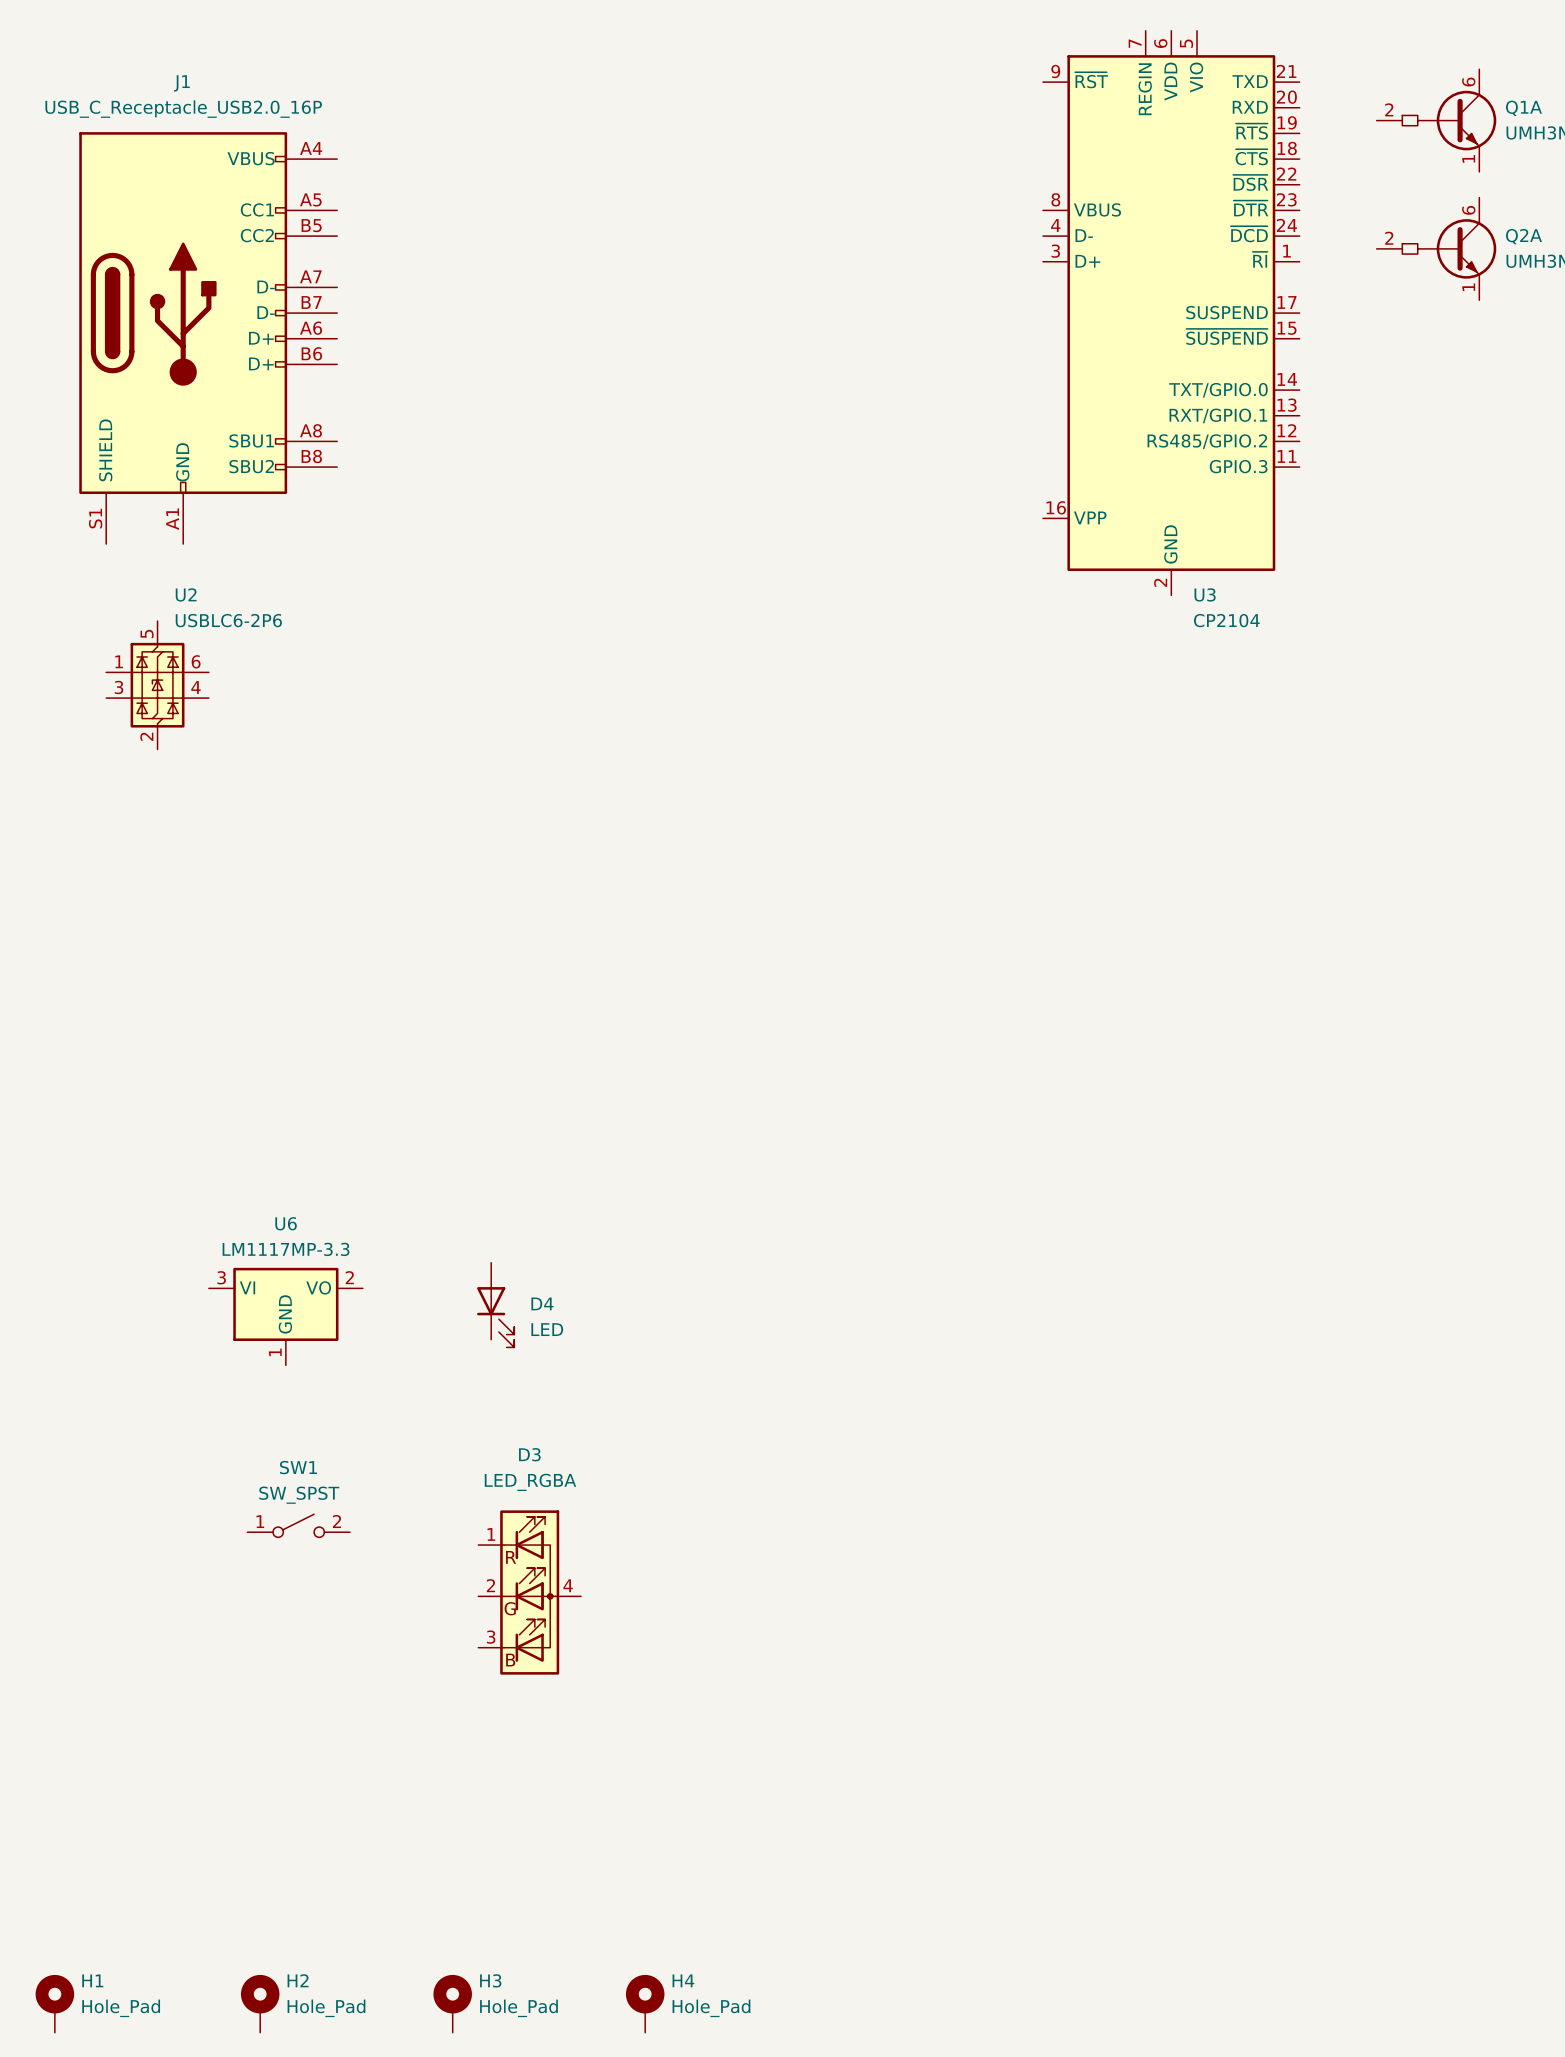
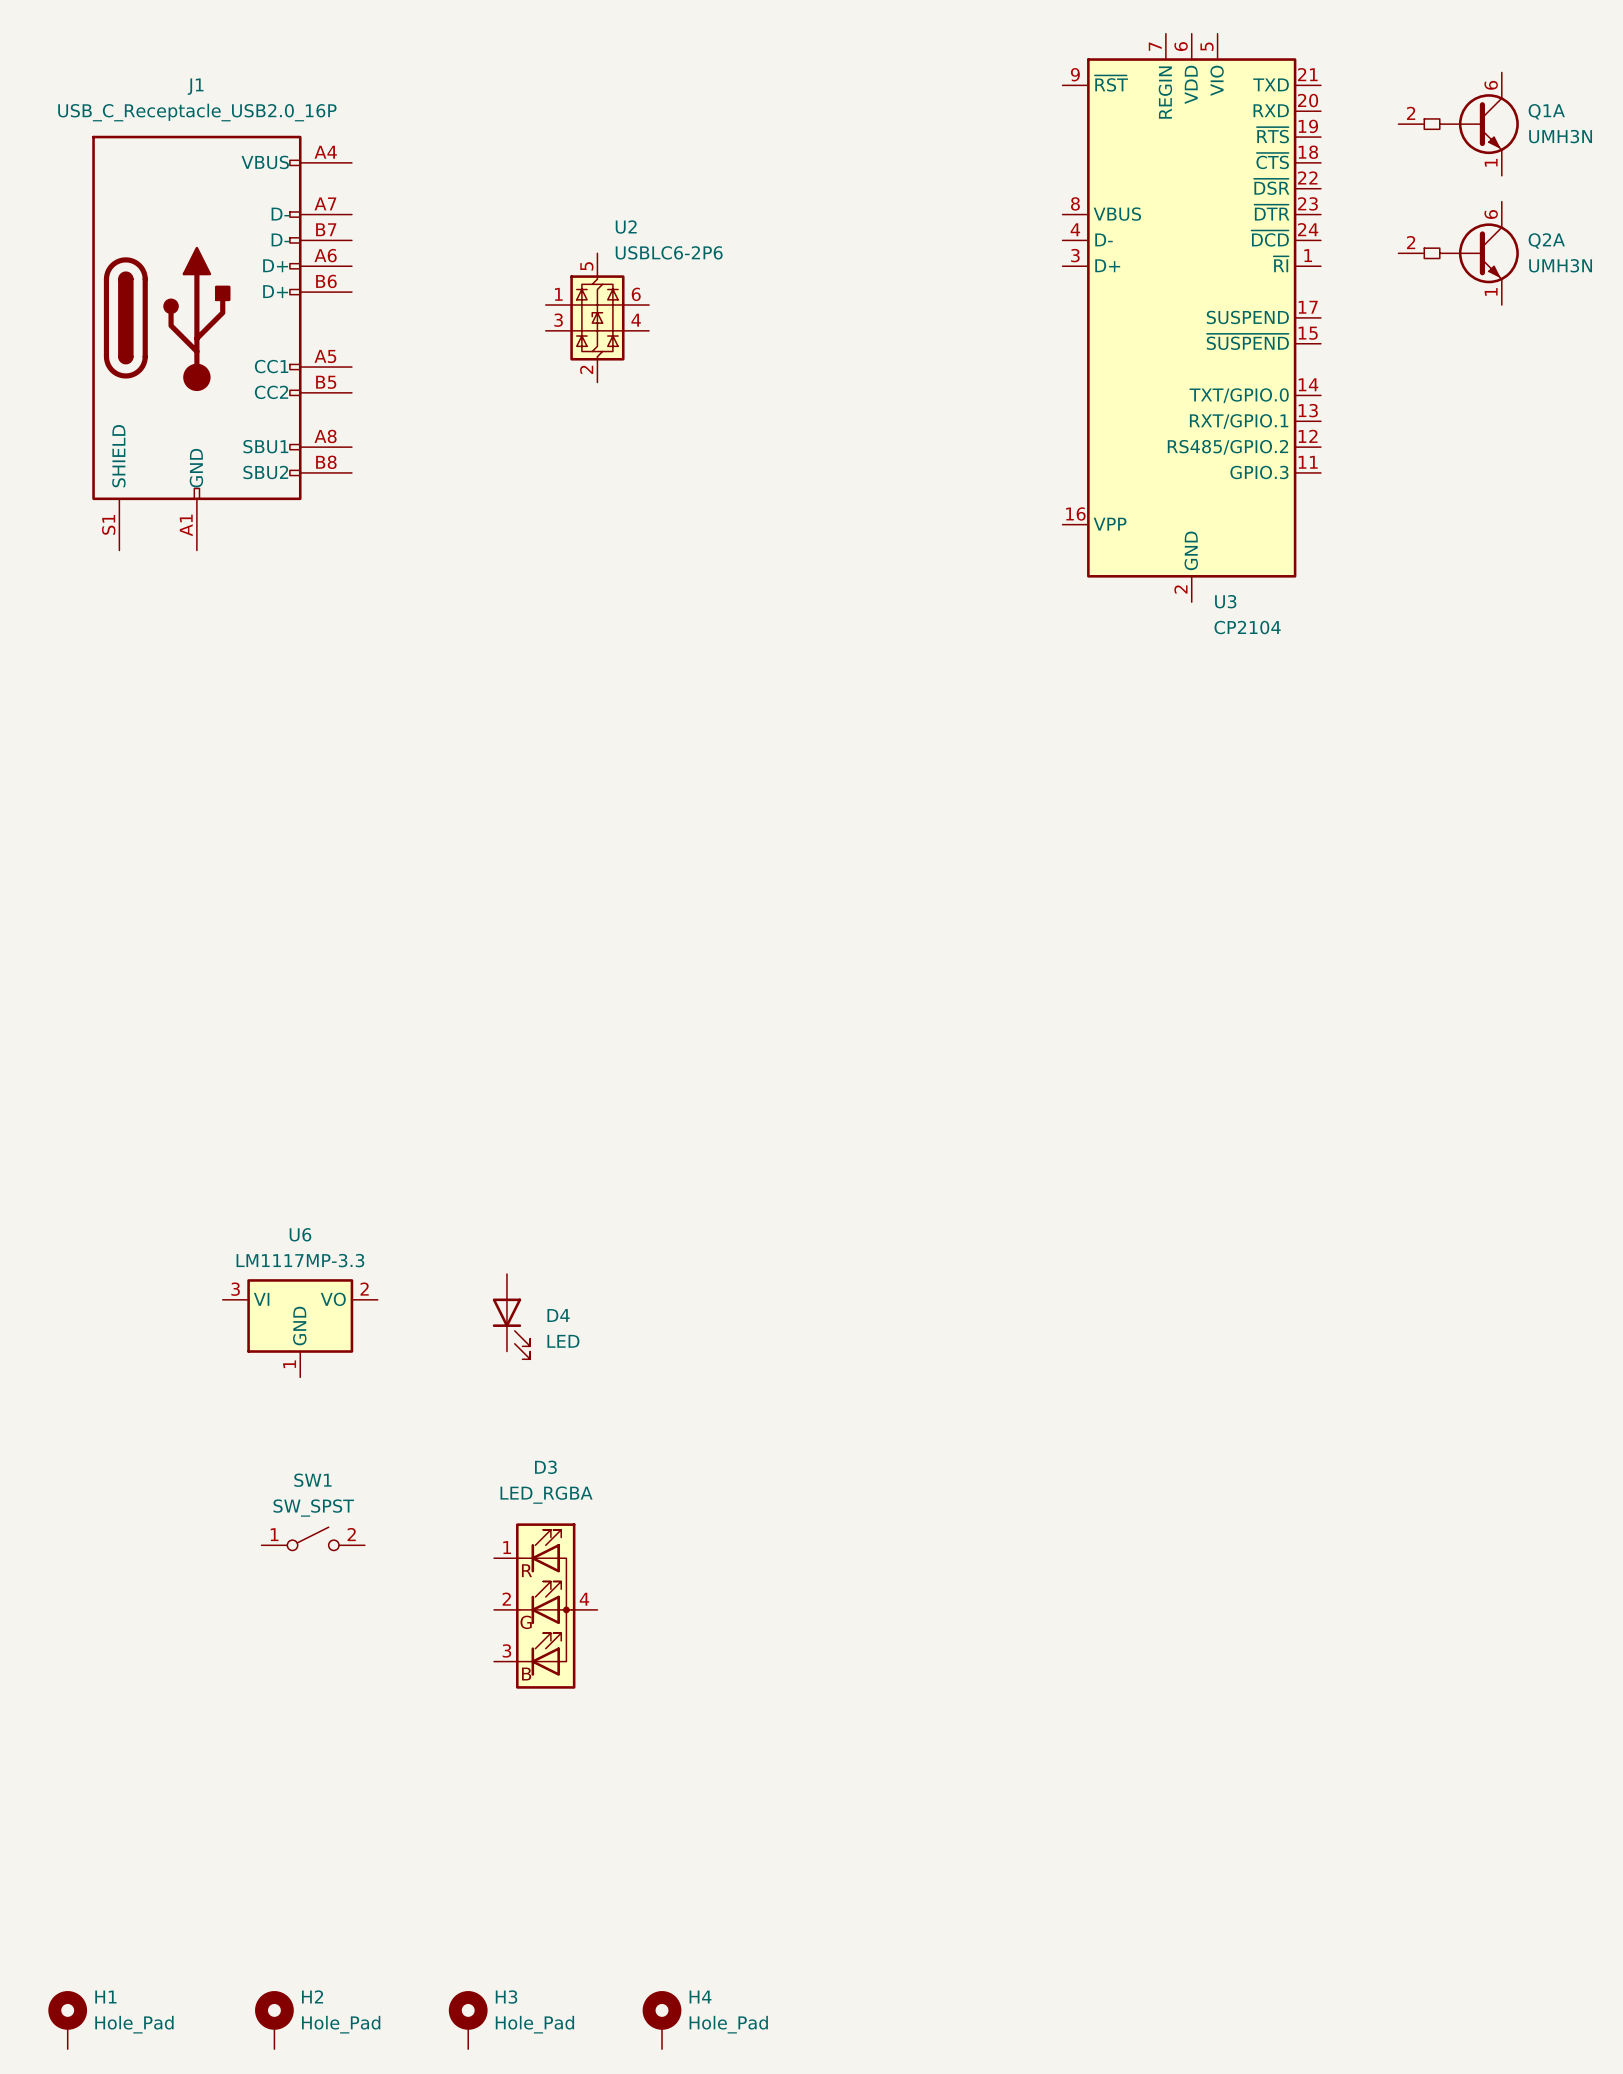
J1 symbol: [79, 132, 338, 545] -> [92, 135, 352, 551]
U2 position: (157, 685) -> (597, 317)

